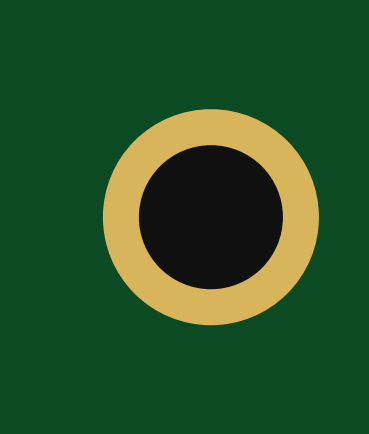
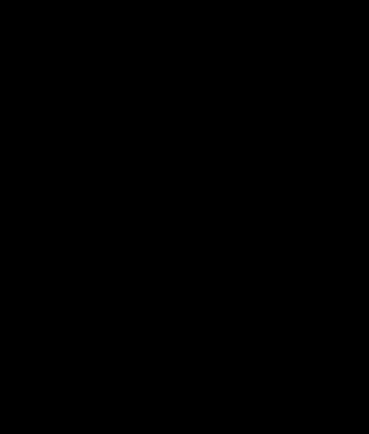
part: (210, 217) -> none

